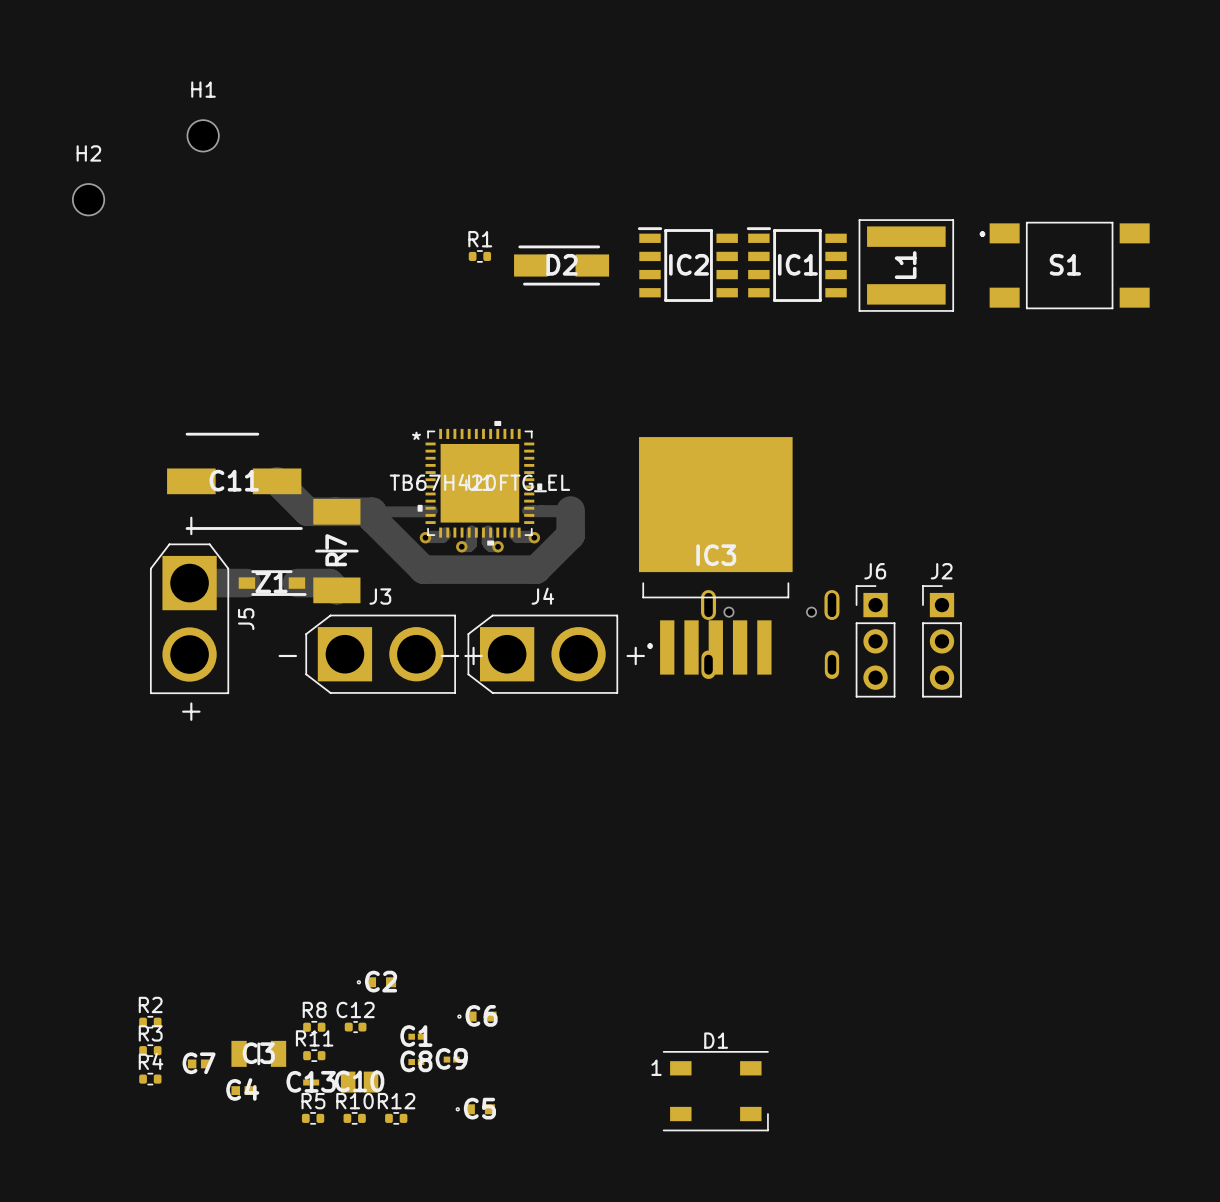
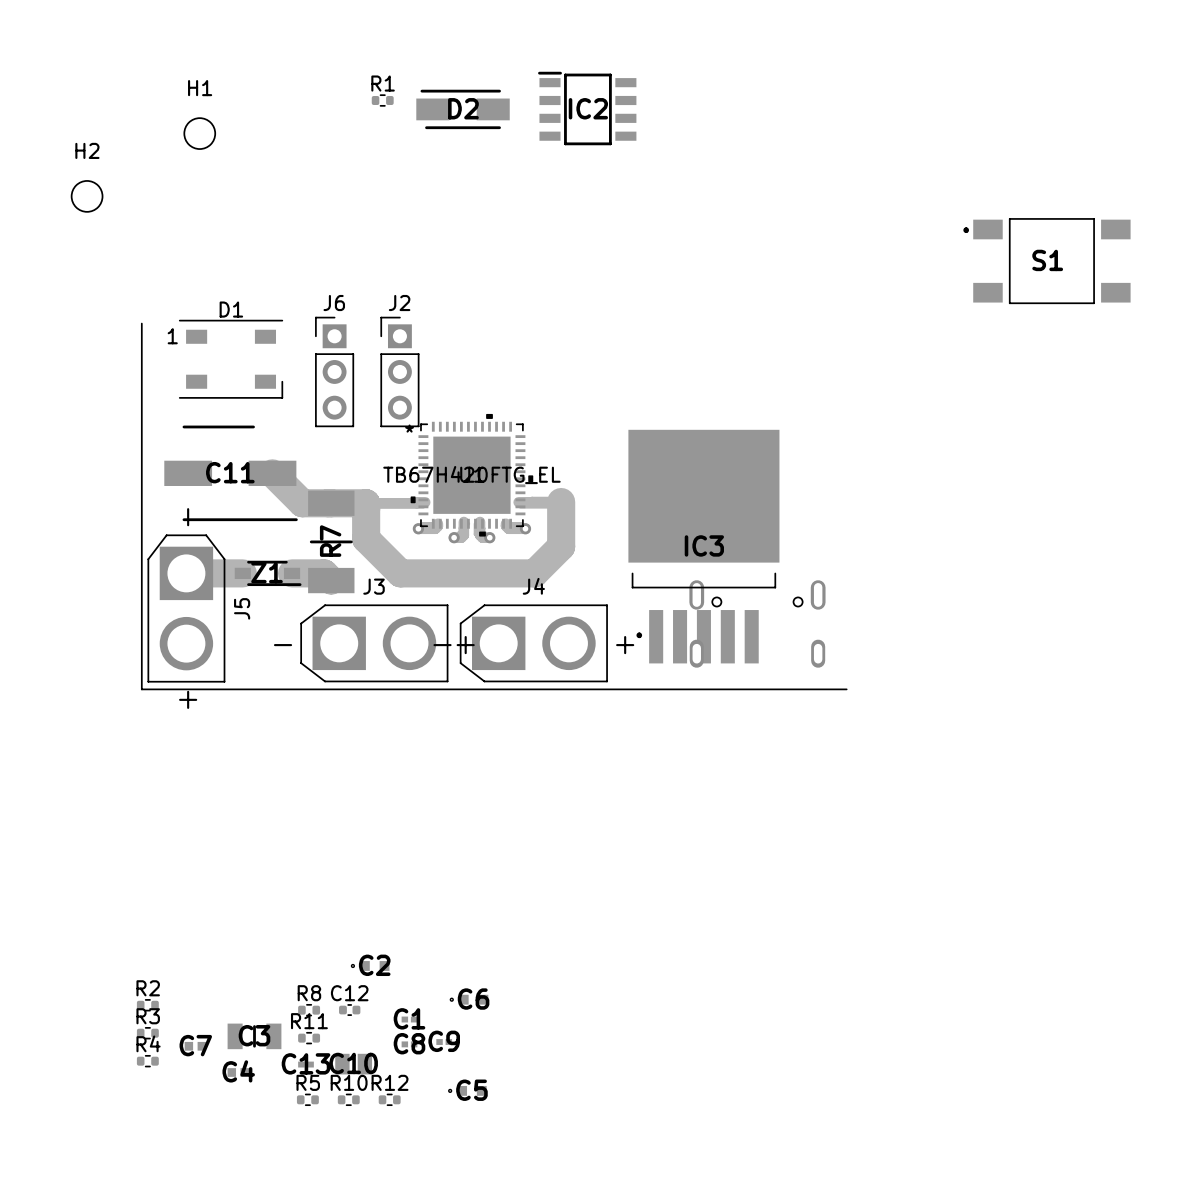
R1 position: (479, 256) -> (382, 100)
IC2 position: (687, 264) -> (587, 108)
IC1: (796, 264) -> none
D2 position: (561, 265) -> (463, 109)
L1: (906, 265) -> none
board edge: none -> (141, 323) (141, 689) (846, 689)
track: (372, 518) (423, 569) (536, 569) (570, 535) -> (366, 509) (366, 538) (400, 573) (534, 573) (561, 546) (561, 526)
J6 position: (875, 641) -> (334, 371)
J2 position: (941, 641) -> (399, 371)
D1 position: (715, 1091) -> (231, 359)

